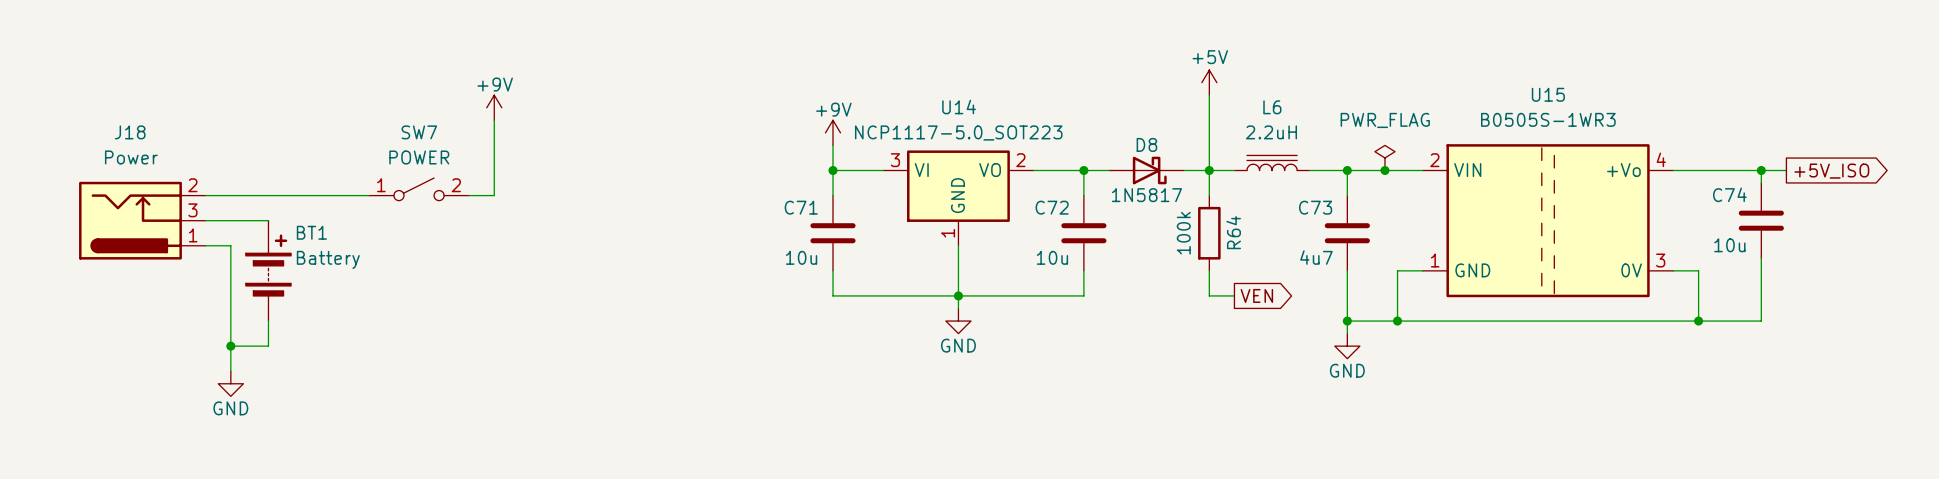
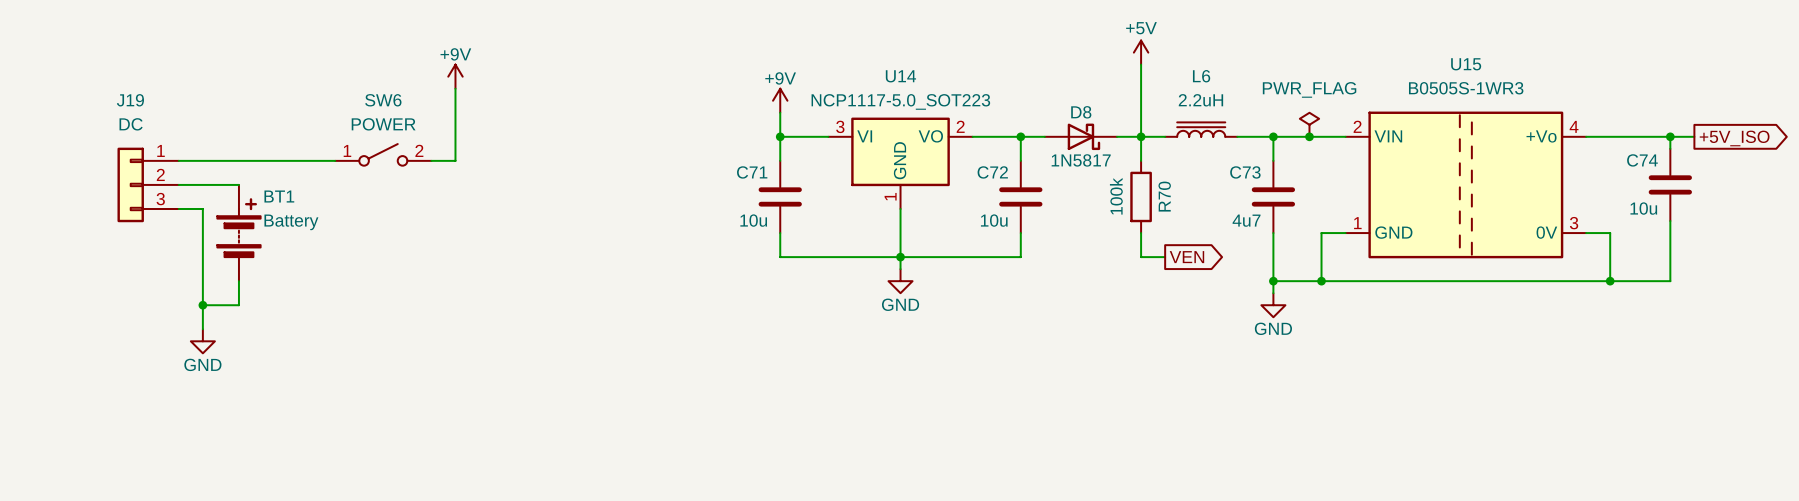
SW7 name: SW7 (419, 132) -> SW6 (383, 100)
J18: Power (142, 220) -> none
J19: none -> DC (148, 184)
R64 name: R64 (1233, 232) -> R70 (1164, 196)

